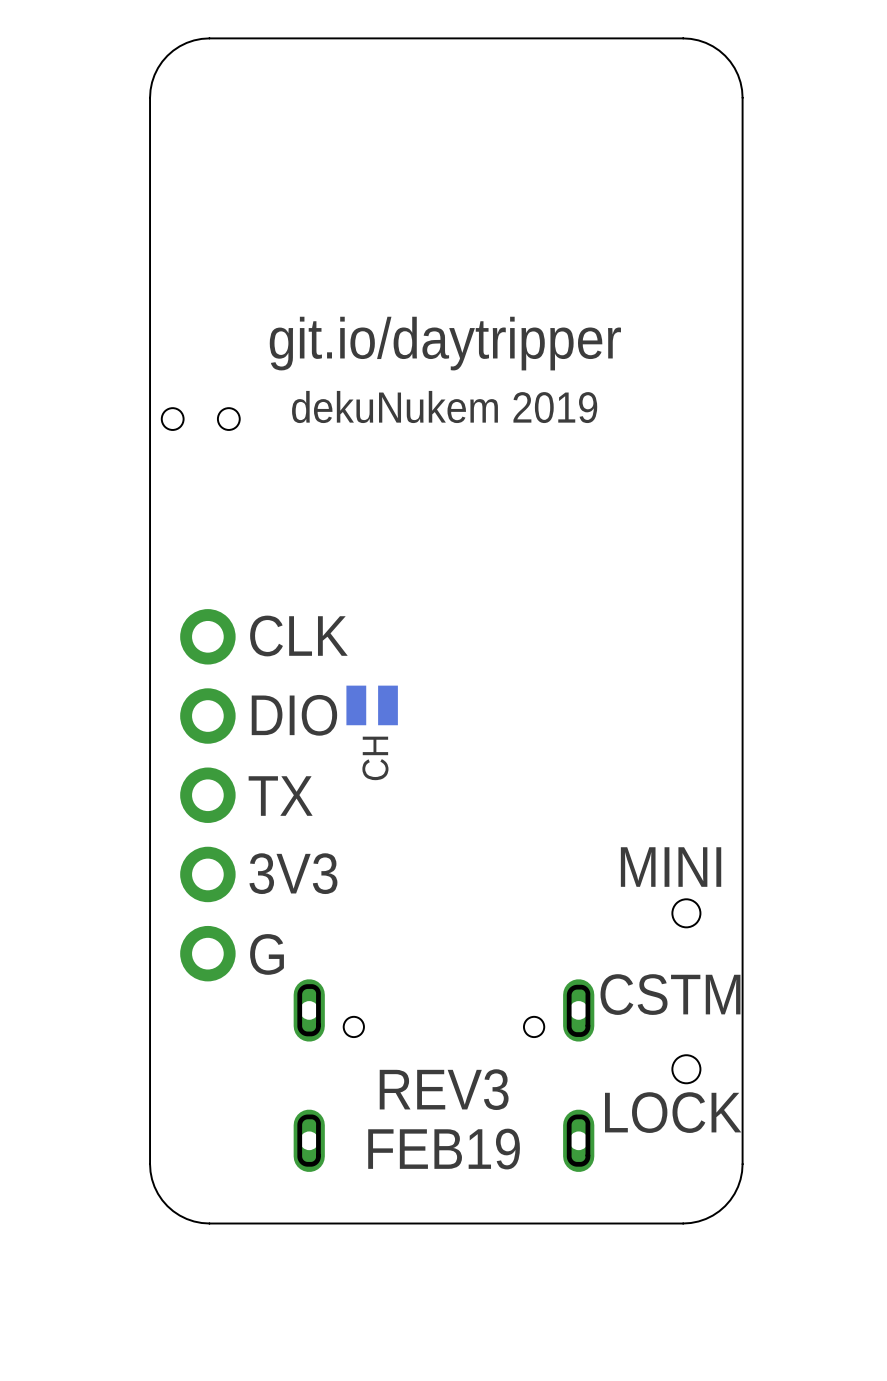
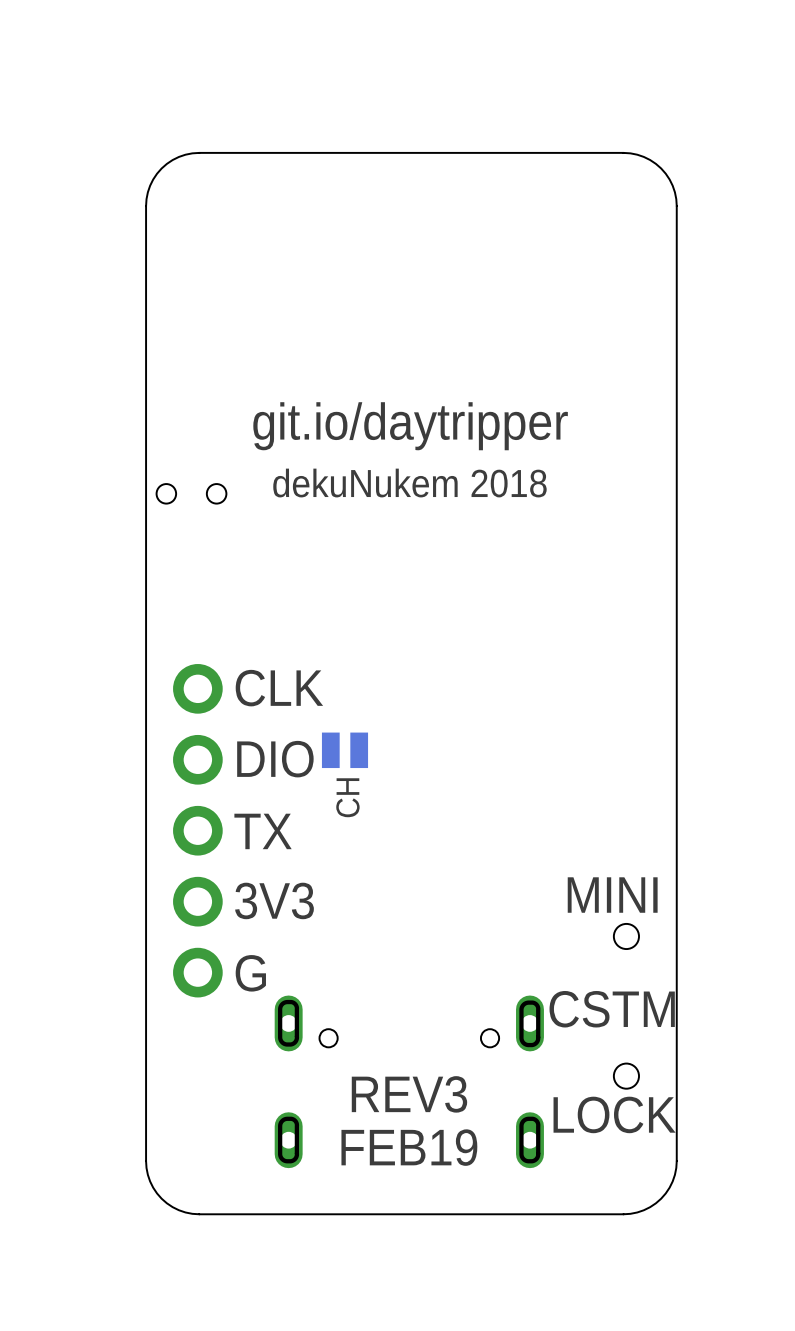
text: dekuNukem 2019 (444, 406) -> dekuNukem 2018 (409, 483)

